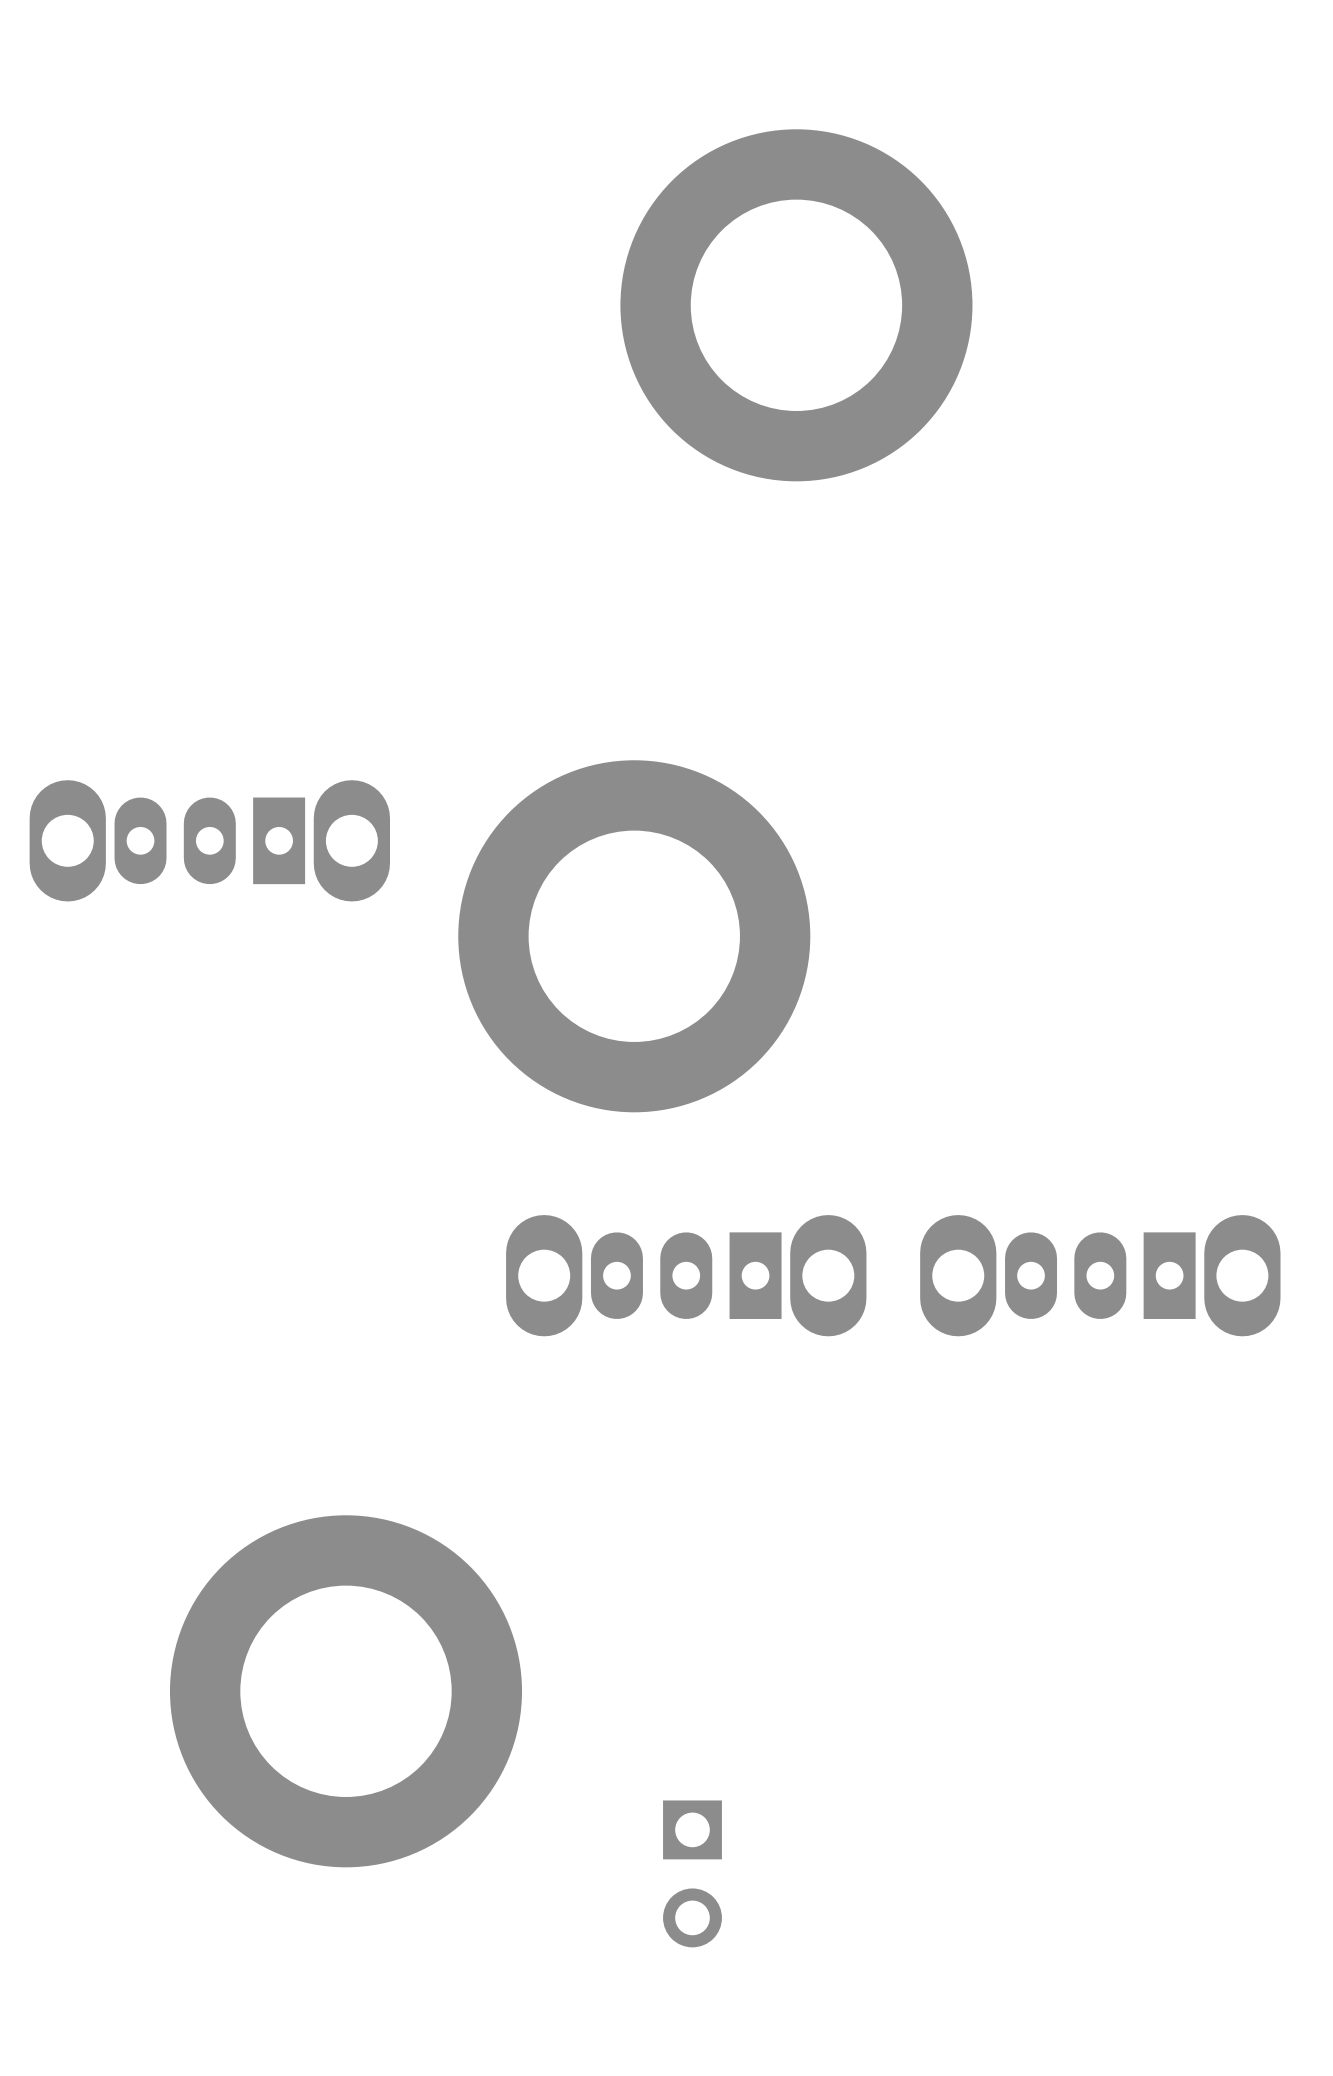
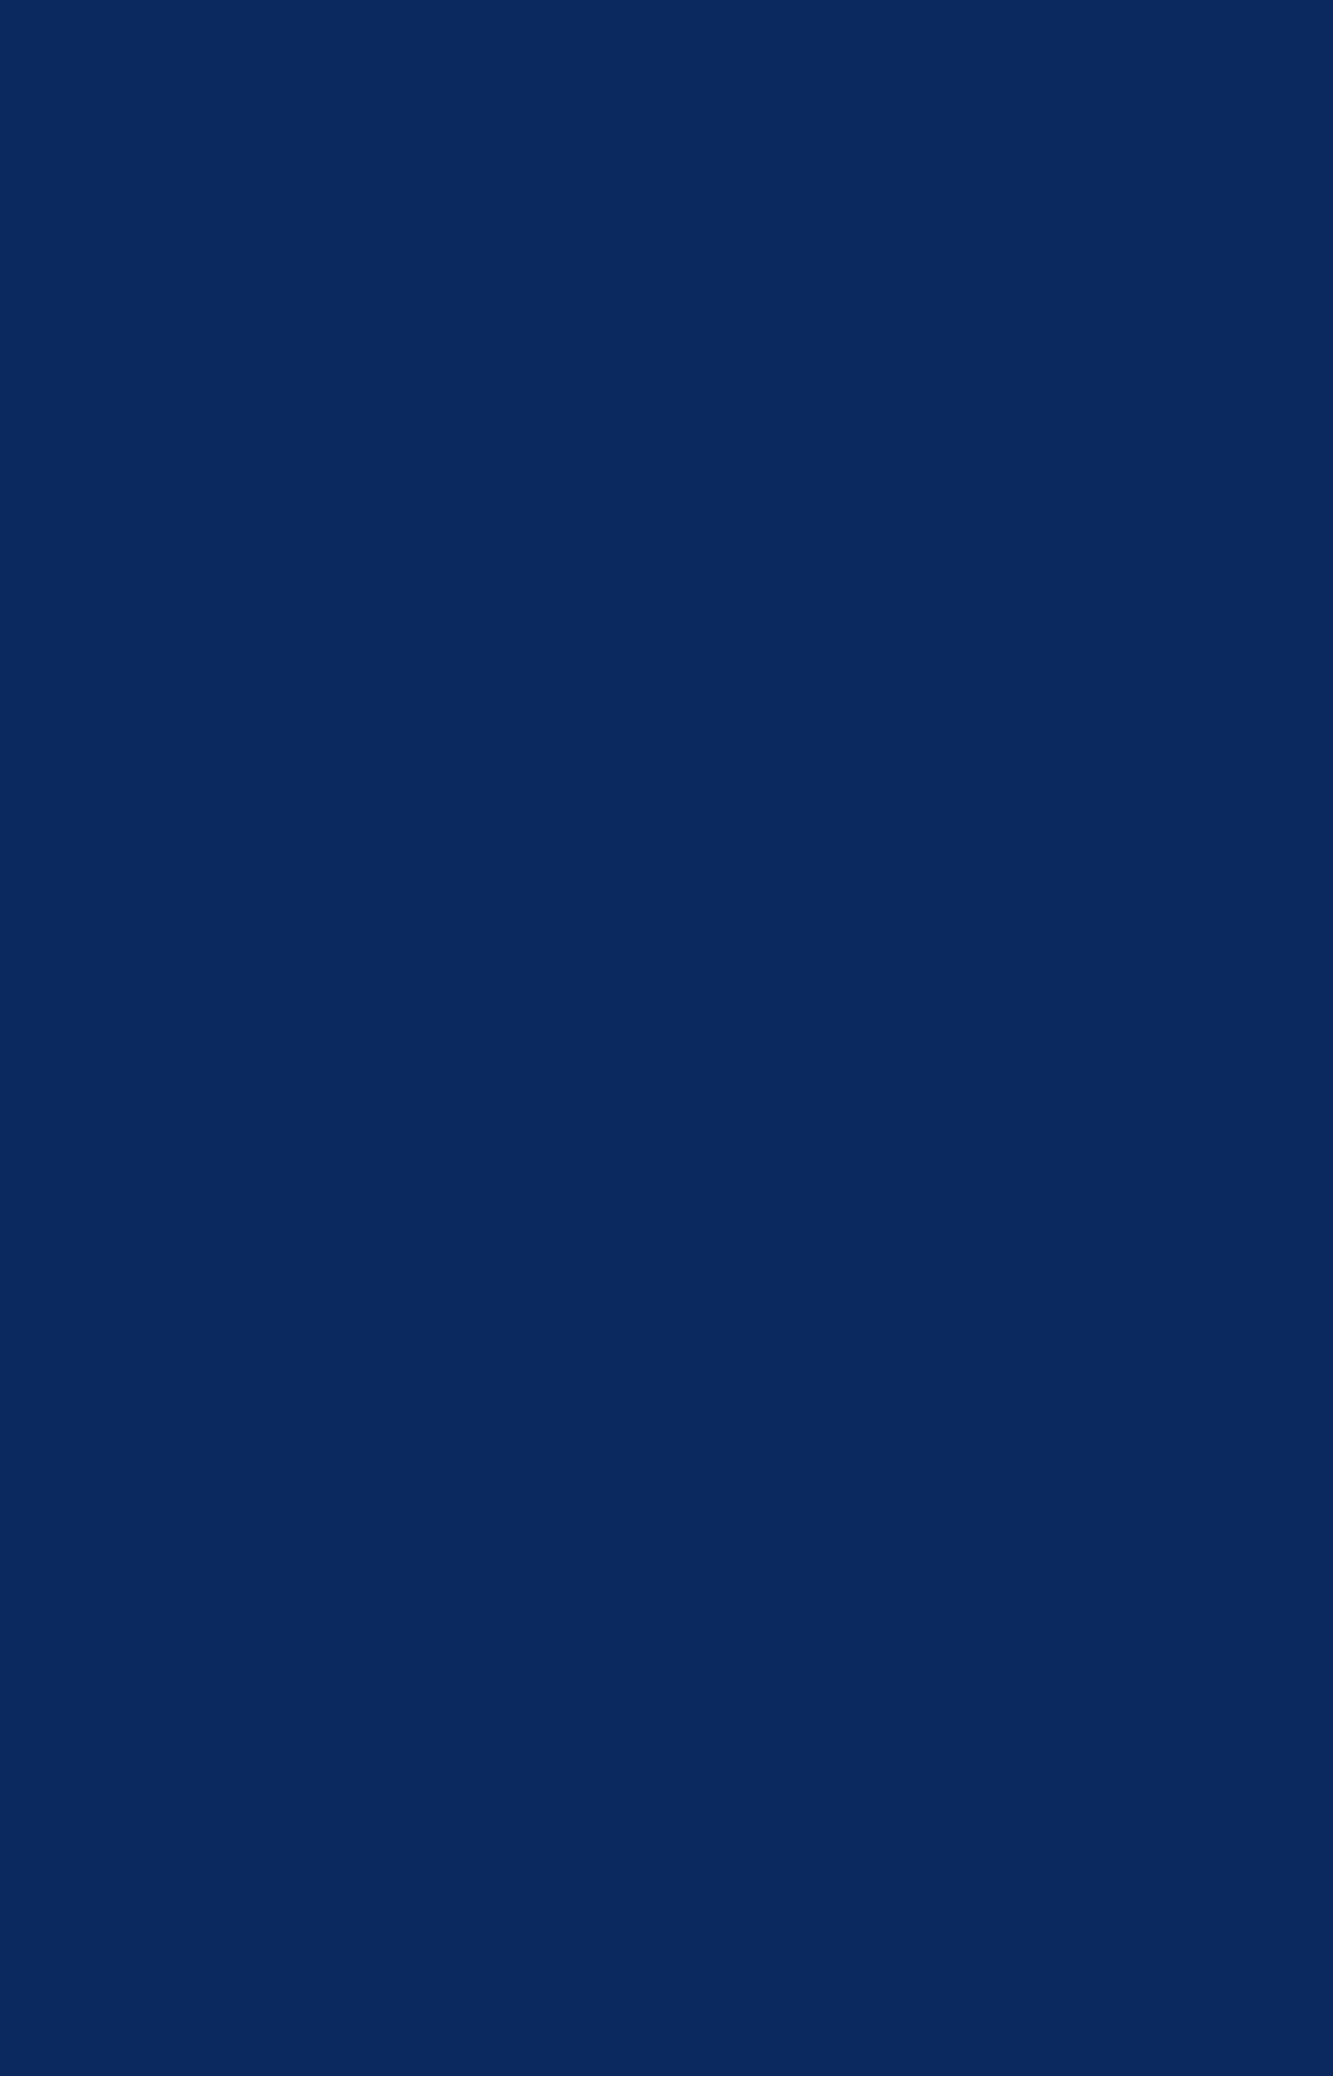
part: (796, 305) -> none
part: (209, 840) -> none
part: (634, 936) -> none
part: (686, 1275) -> none
part: (1100, 1275) -> none
part: (345, 1691) -> none
part: (692, 1873) -> none

